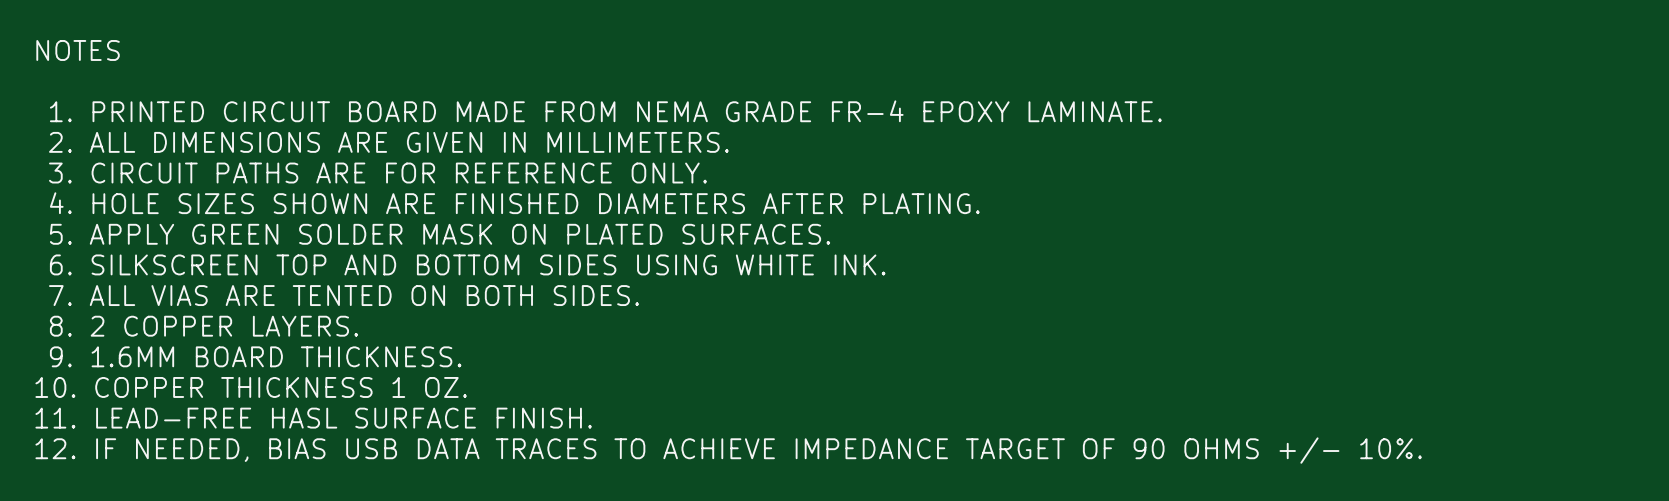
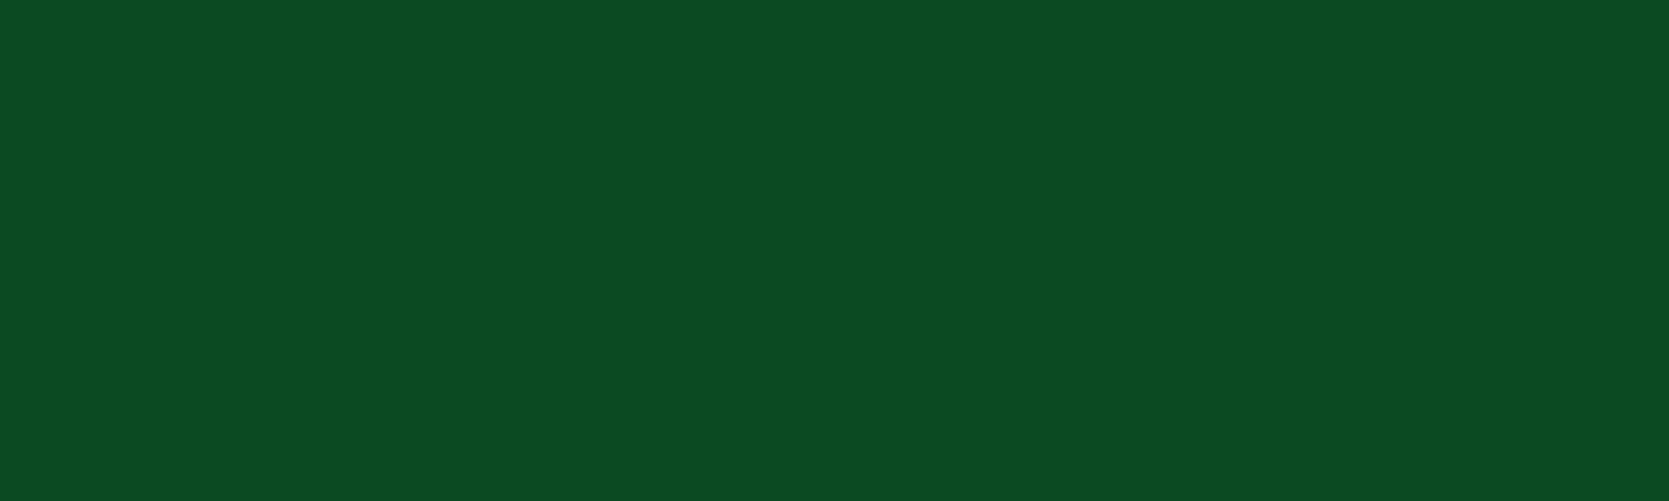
text: NOTES (78, 50) -> none
text: 1. PRINTED CIRCUIT BOARD MADE FROM NEMA GRADE FR-4 EPOXY LAMINATE. (605, 111) -> none
text: 2. ALL DIMENSIONS ARE GIVEN IN MILLIMETERS. (388, 142) -> none
text: 3. CIRCUIT PATHS ARE FOR REFERENCE ONLY. (377, 173) -> none
text: 4. HOLE SIZES SHOWN ARE FINISHED DIAMETERS AFTER PLATING. (514, 203) -> none
text: 5. APPLY GREEN SOLDER MASK ON PLATED SURFACES. (440, 234) -> none
text: 6. SILKSCREEN TOP AND BOTTOM SIDES USING WHITE INK. (467, 264) -> none
text: 7. ALL VIAS ARE TENTED ON BOTH SIDES. (343, 295) -> none
text: 8. 2 COPPER LAYERS. (204, 326) -> none
text: 9. 1.6MM BOARD THICKNESS. (255, 356) -> none
text: 10. COPPER THICKNESS 1 OZ. (251, 387) -> none
text: 11. LEAD-FREE HASL SURFACE FINISH. (313, 418) -> none
text: 12. IF NEEDED, BIAS USB DATA TRACES TO ACHIEVE IMPEDANCE TARGET OF 90 OHMS +/- 10%. (728, 450) -> none

